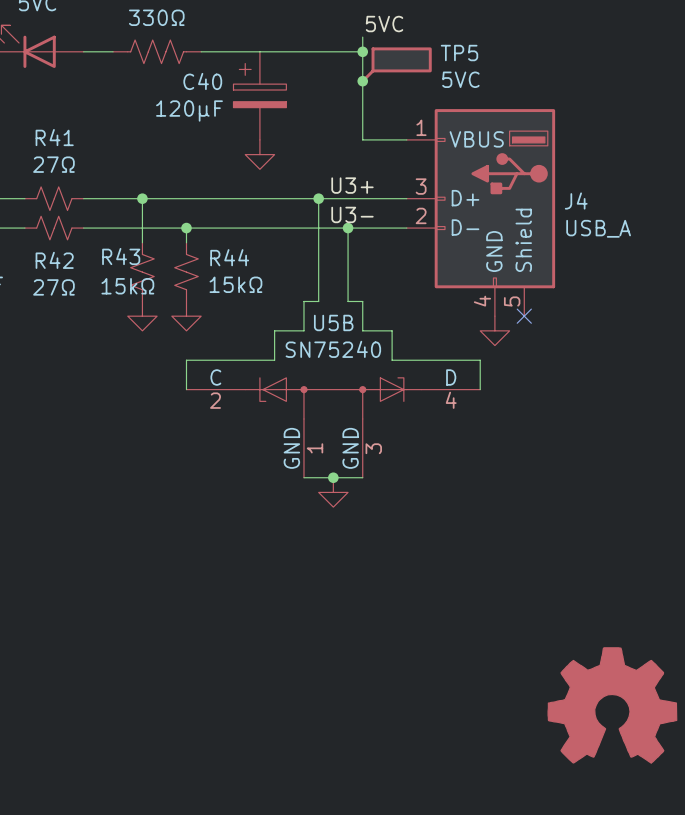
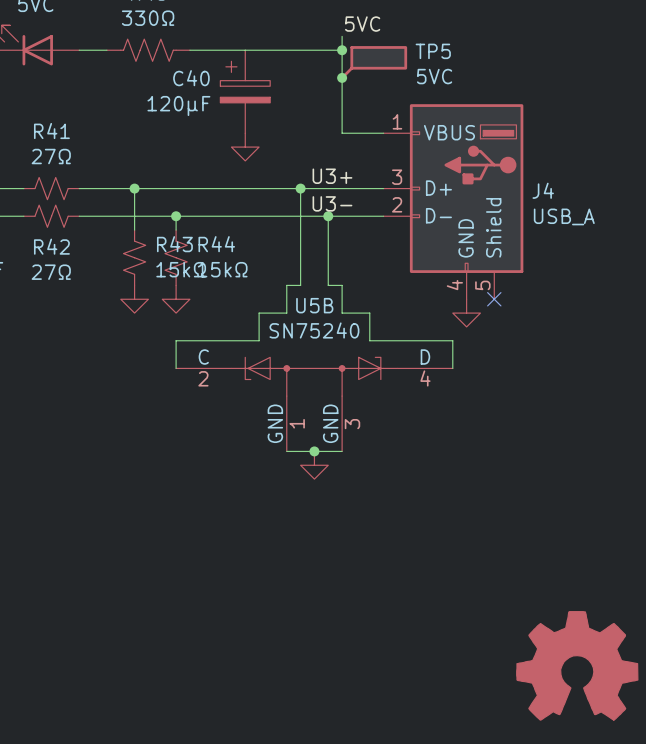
R43 name position: R43 (121, 256) -> R43 (174, 244)
R43 value position: 15kΩ (127, 286) -> 15kΩ (181, 269)

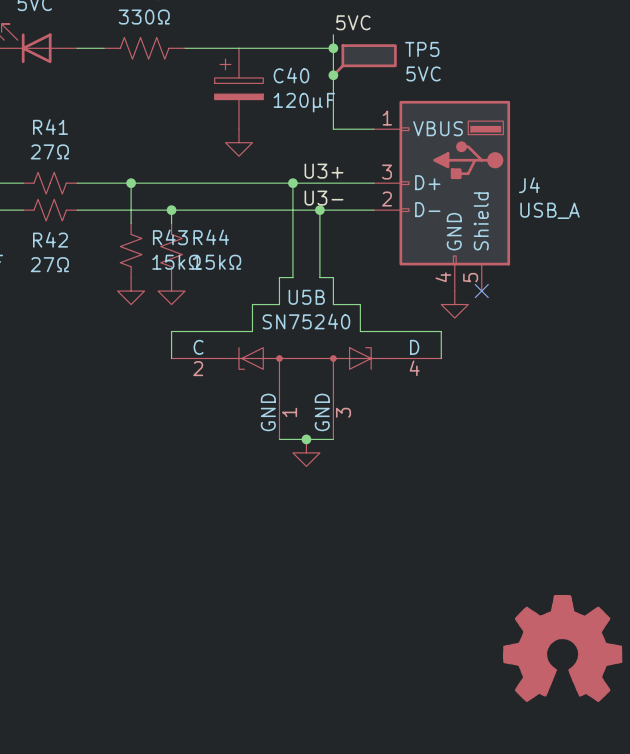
C40 name position: C40 (191, 78) -> C40 (291, 75)
C40 value position: 120μF (178, 105) -> 120μF (304, 102)

